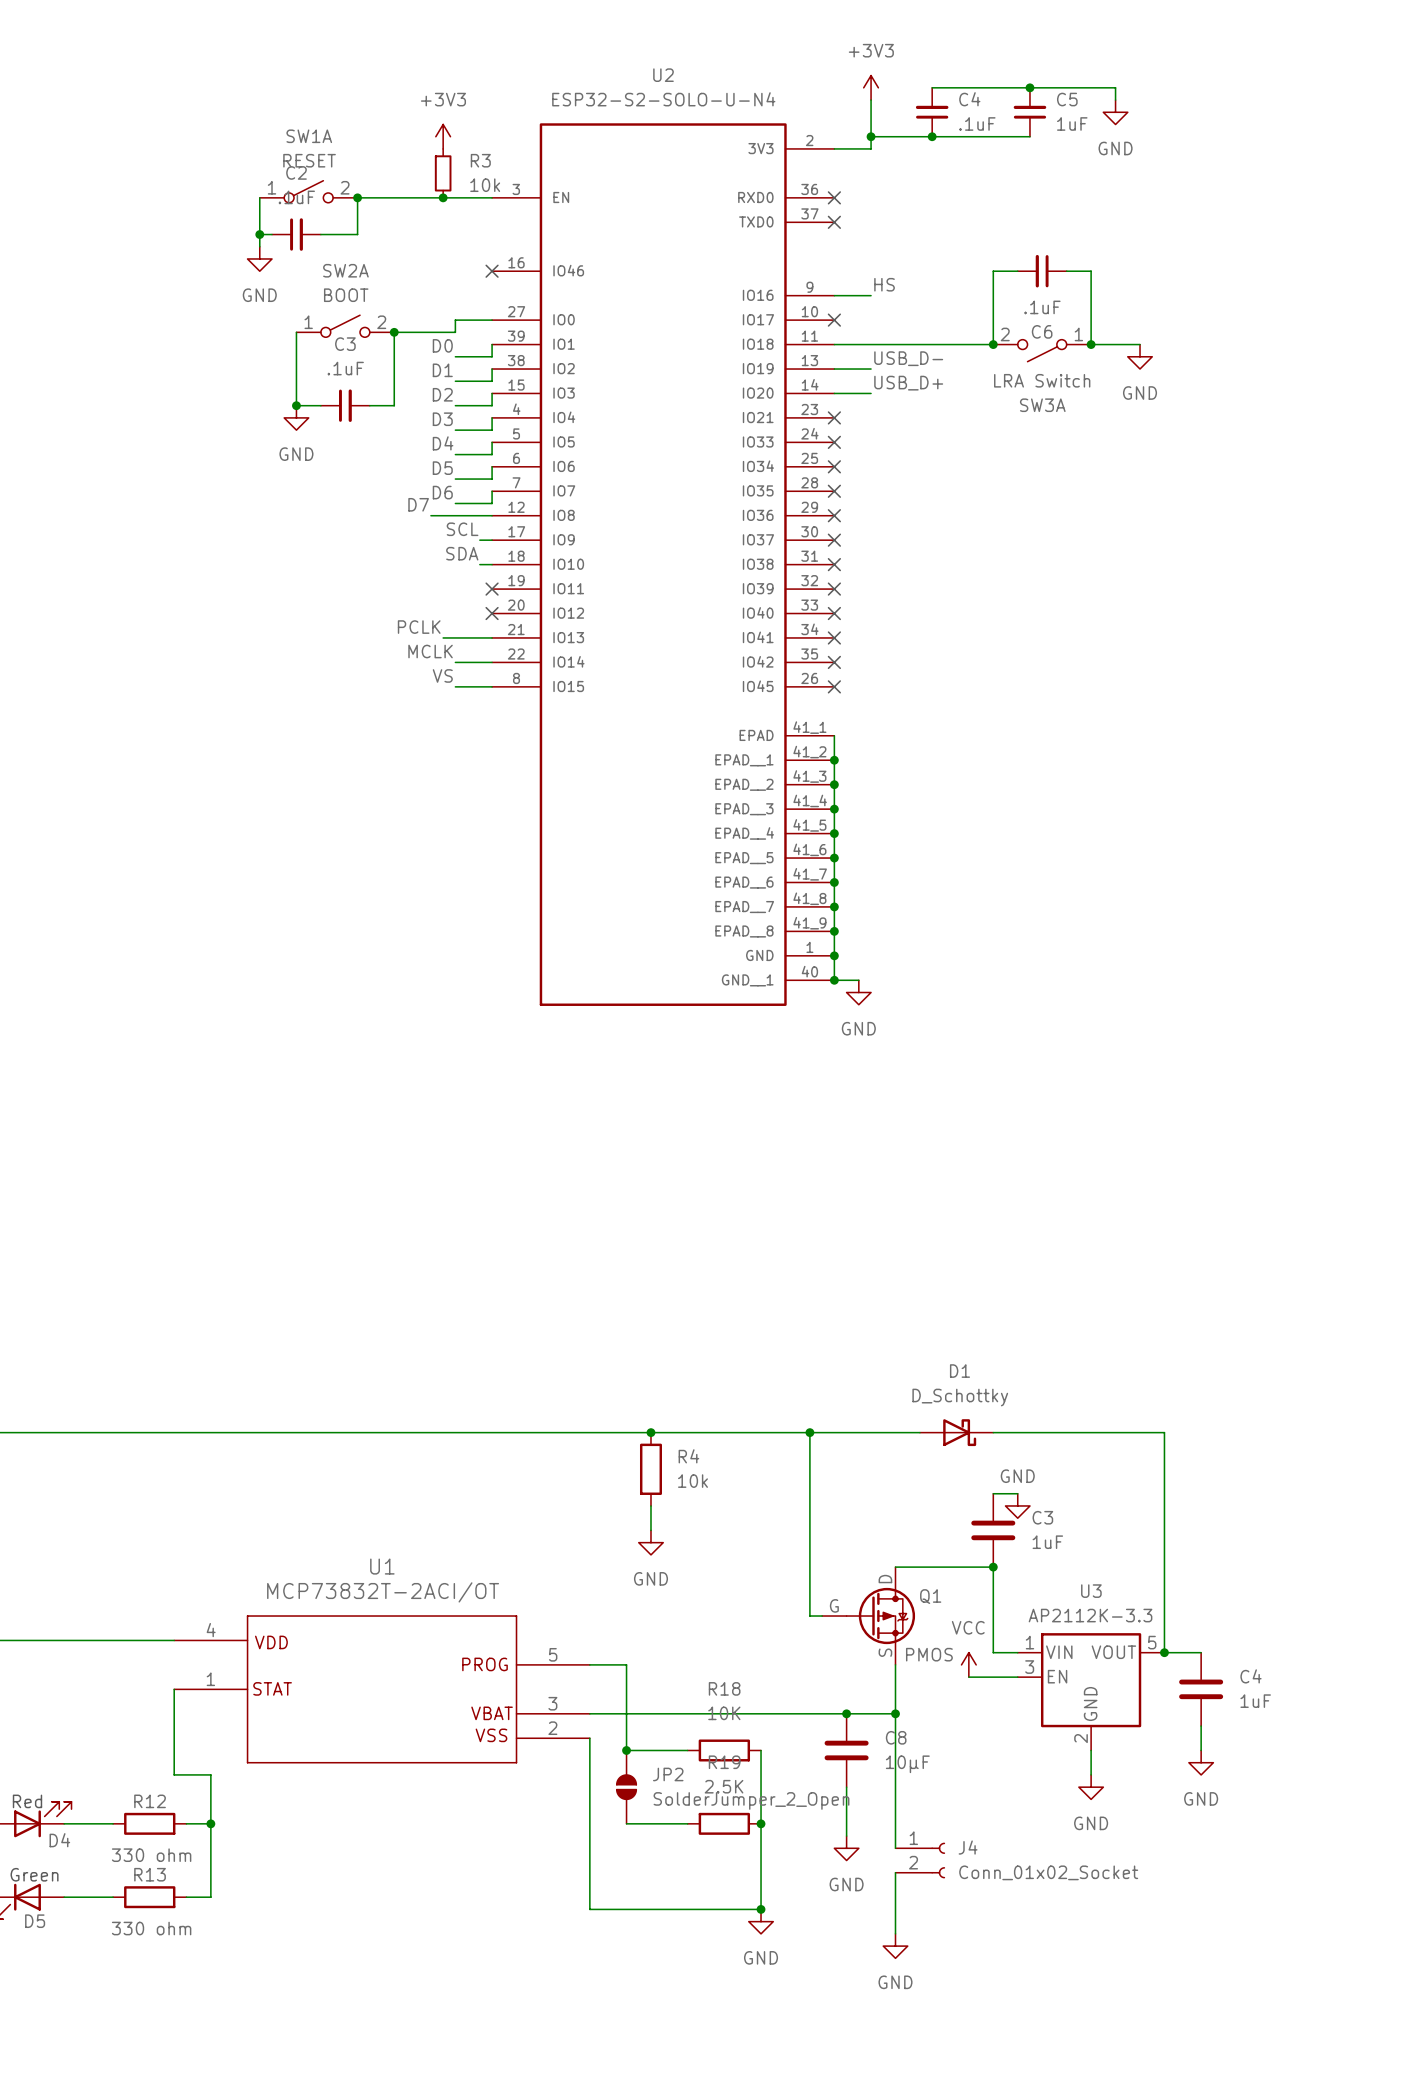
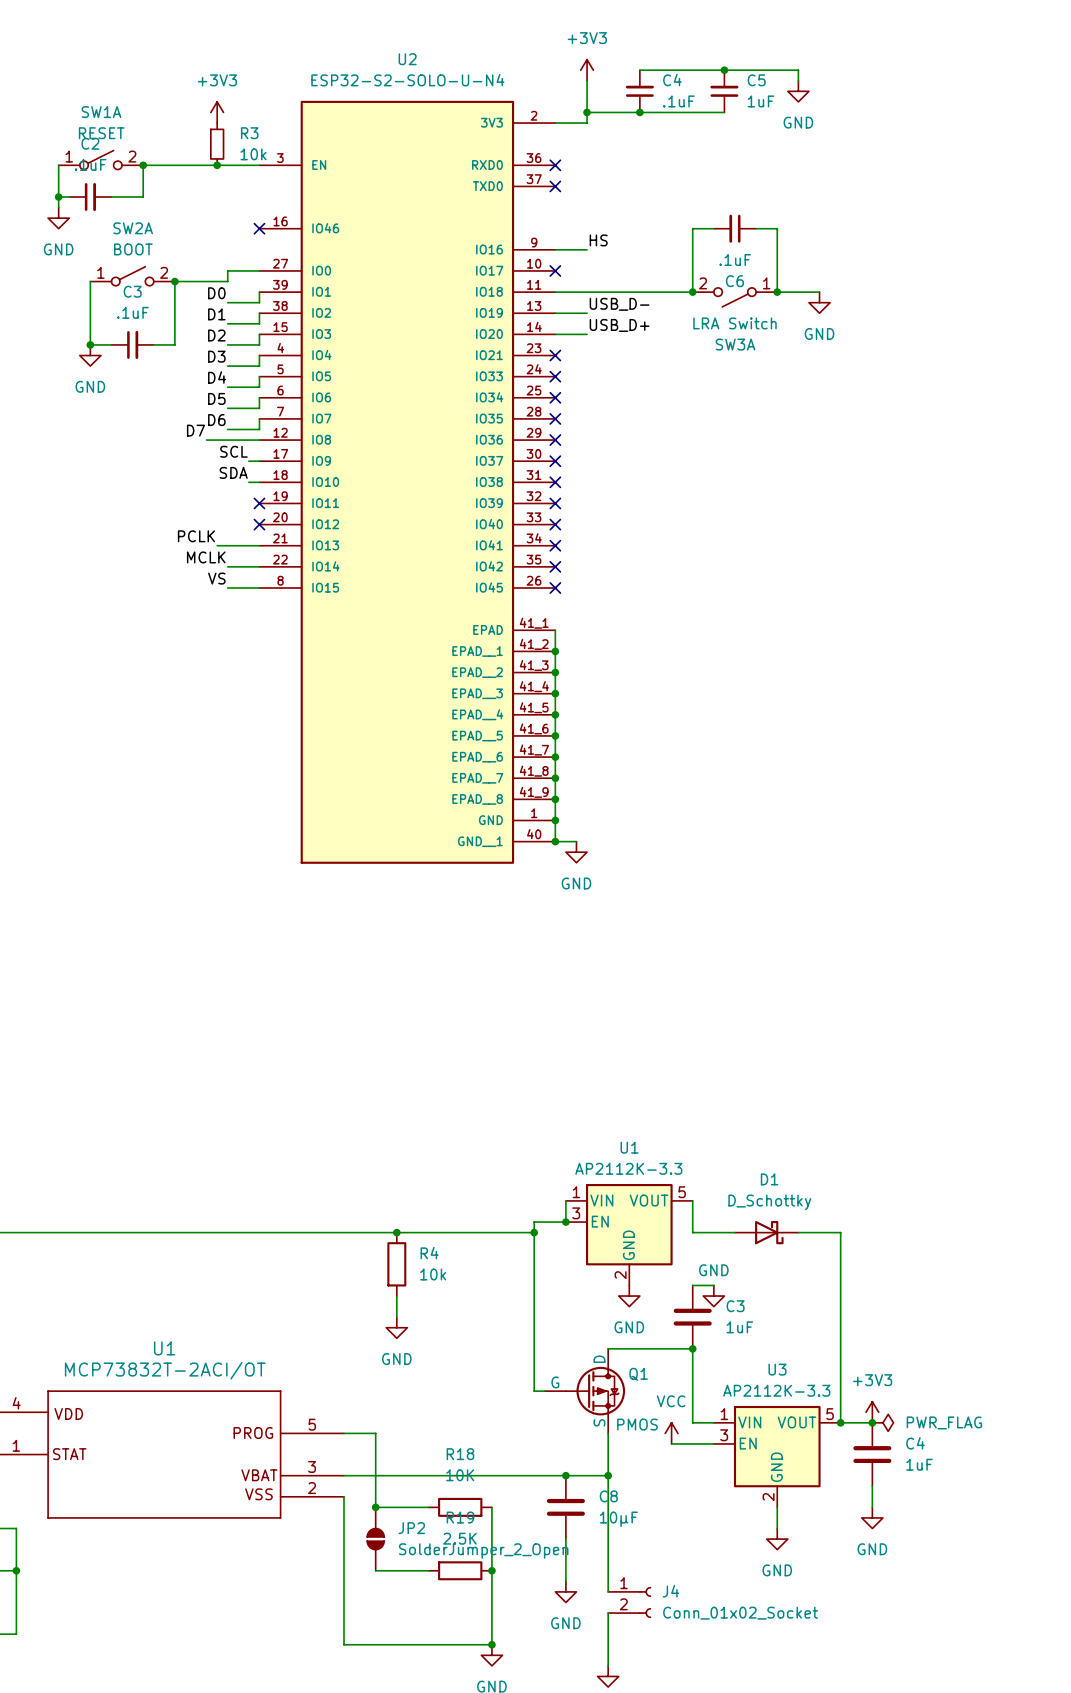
wire: none -> (692, 1200) (692, 1232)
junction: none -> (565, 1222)
wire: (809, 1432) (919, 1432) -> (534, 1232) (534, 1222) (565, 1222) (565, 1200)
D1 position: (956, 1432) -> (766, 1232)
U1: none -> AP2112K-3.3 (629, 1234)
power symbol: none -> GND (629, 1296)
power symbol: none -> +3V3 (872, 1412)
junction: none -> (872, 1422)
power symbol: none -> PWR_FLAG (882, 1422)

